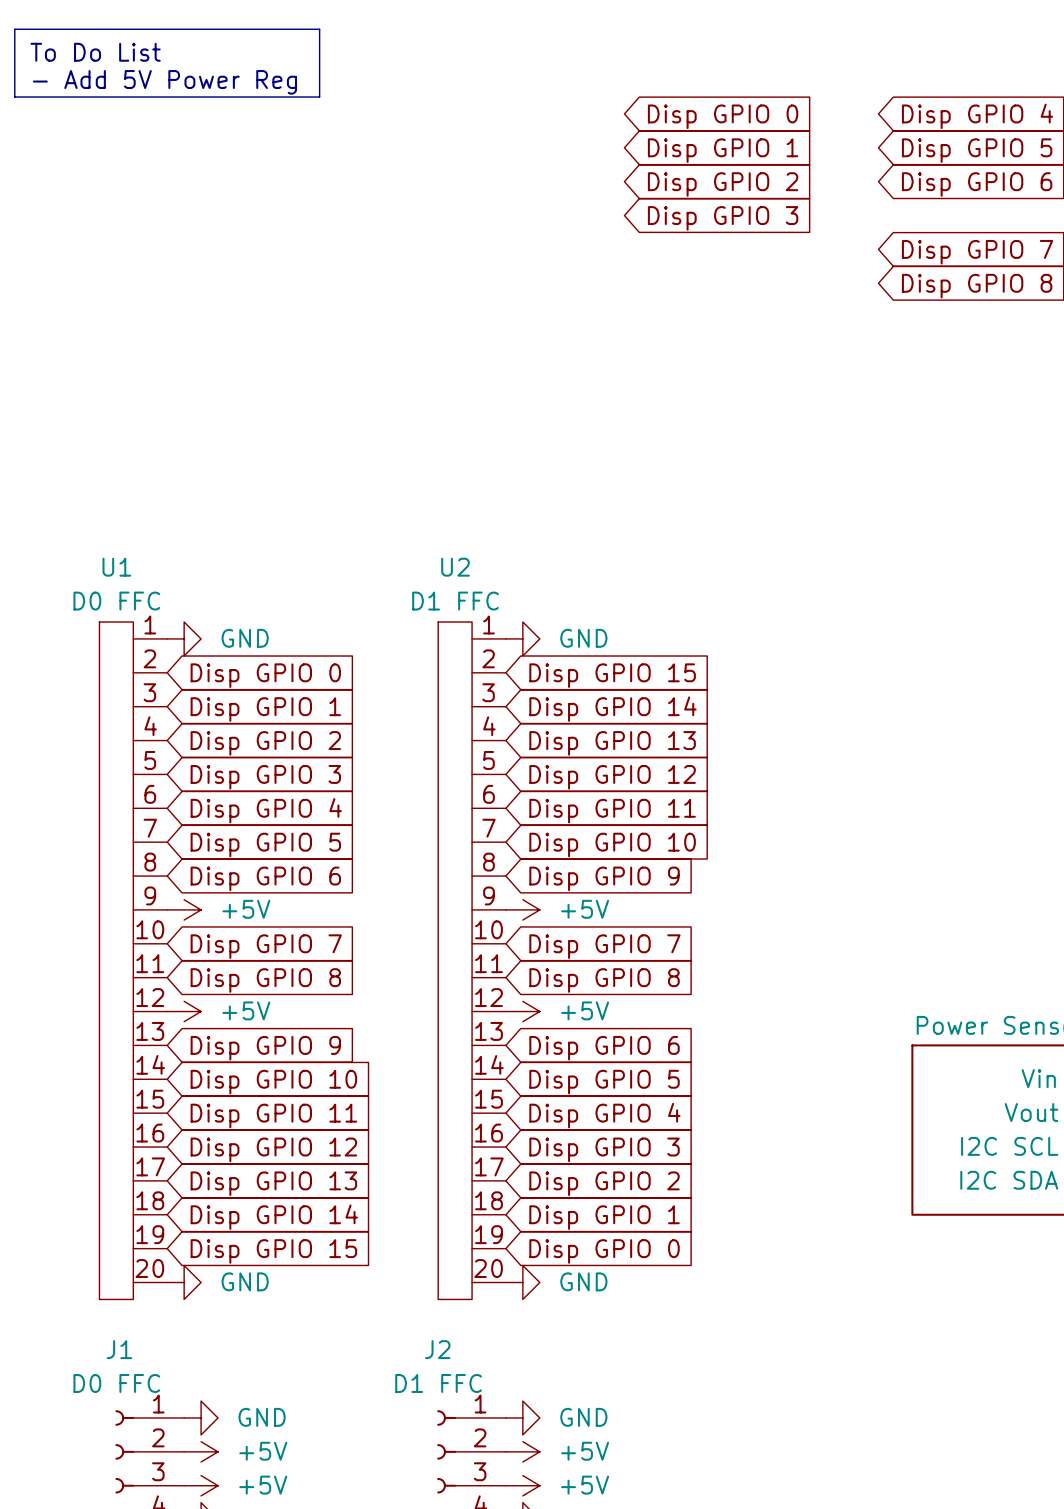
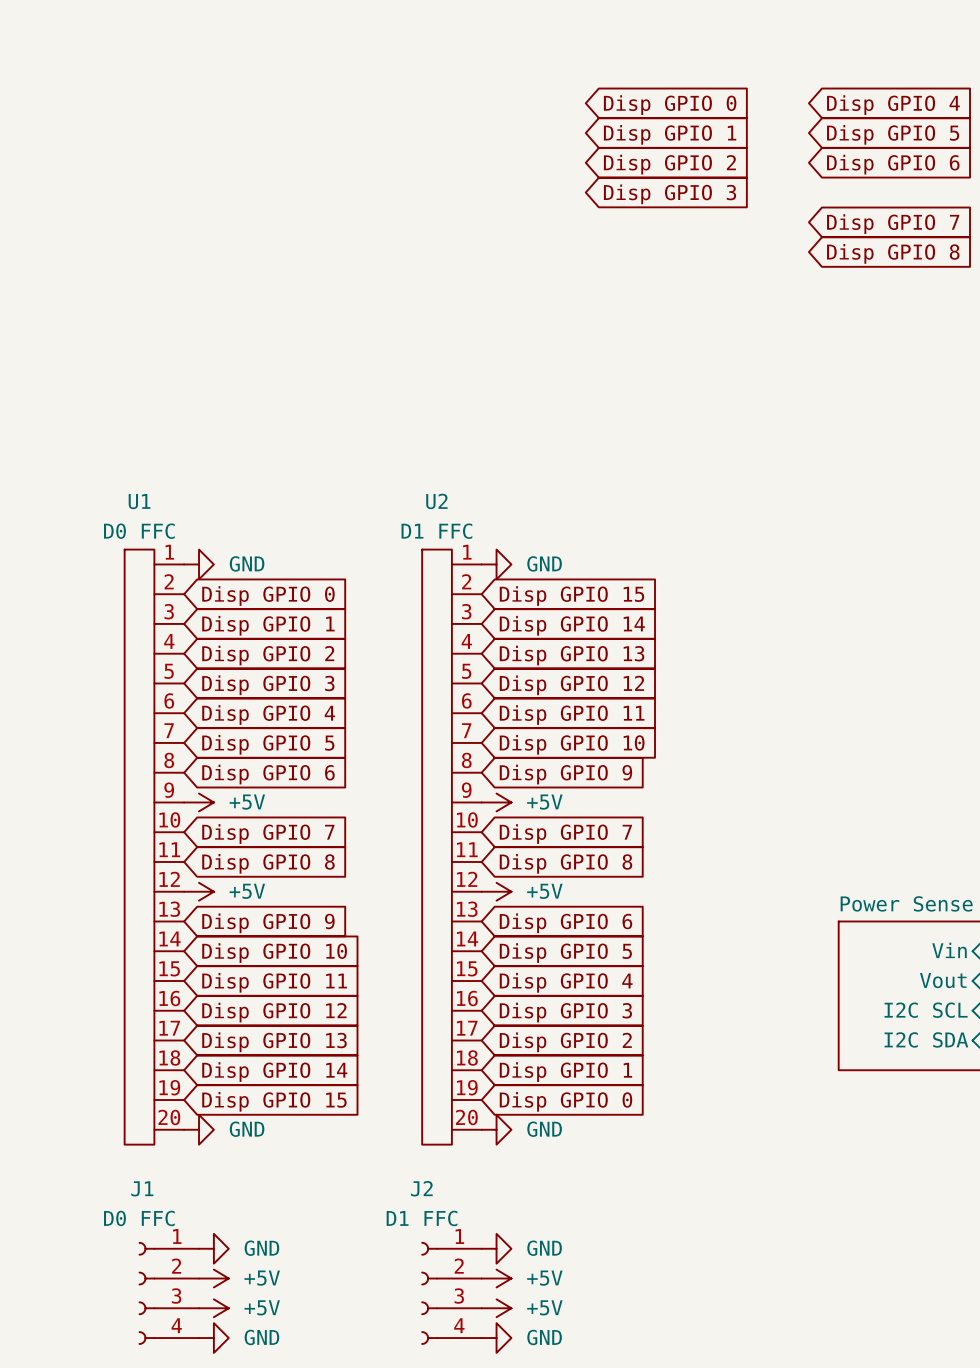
line: (14, 29) (319, 29) (319, 97) (14, 97) (14, 29) -> none
text: To Do List (95, 52) -> none
text: - Add 5V Power Reg (164, 82) -> none

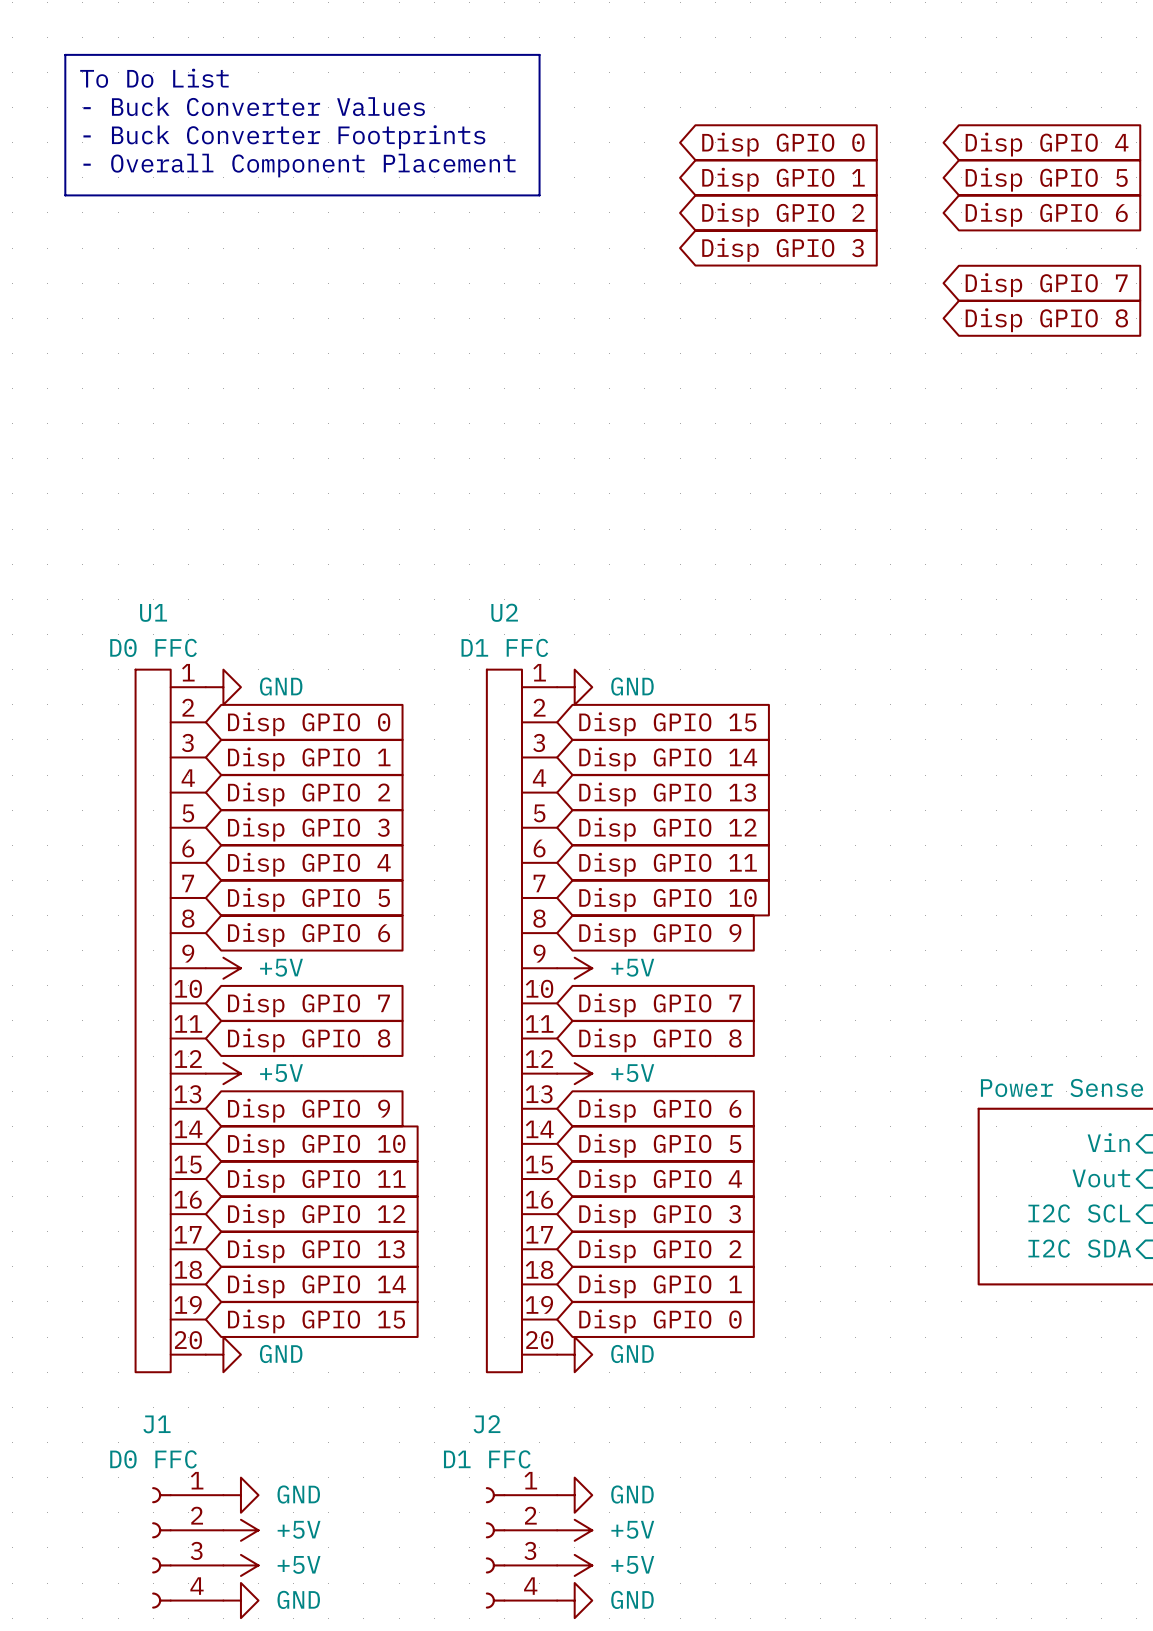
line: none -> (65, 54) (539, 54) (539, 195) (65, 195) (65, 54)
text: none -> To Do List (154, 78)
text: none -> - Buck Converter Values (254, 106)
text: none -> - Buck Converter Footprints (284, 137)
text: none -> - Overall Component Placement (299, 165)

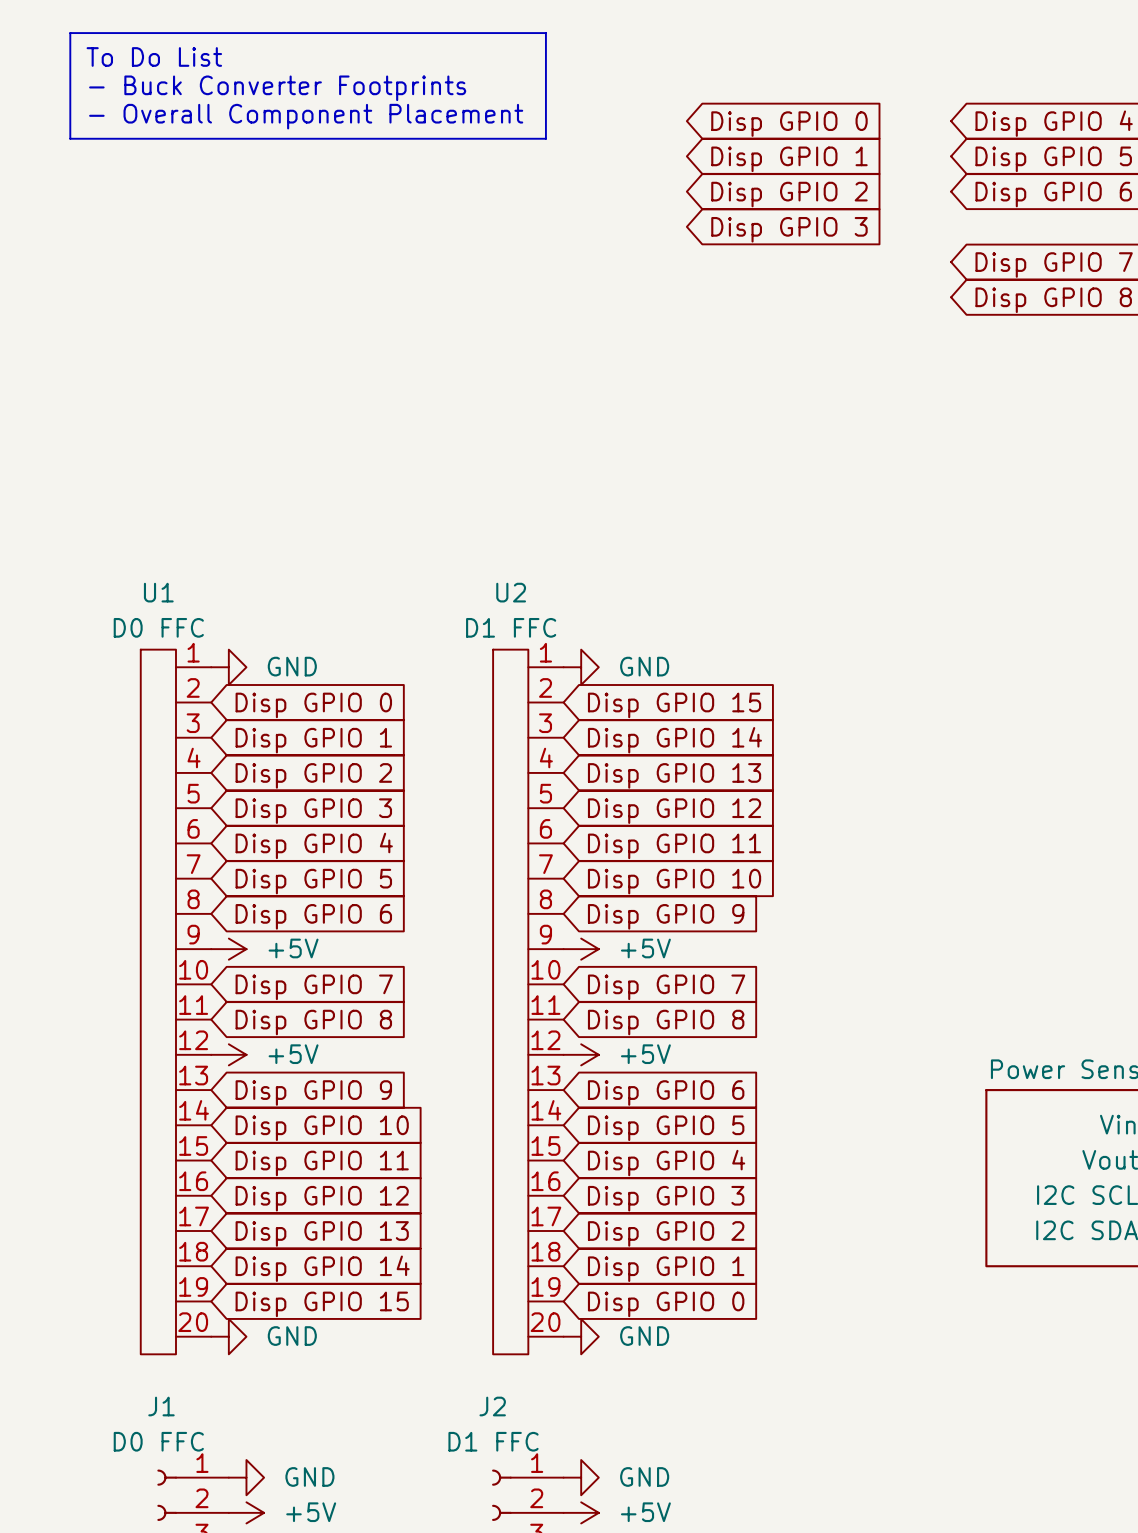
text: - Buck Converter Values (254, 106) -> - Buck Converter Footprints (277, 88)
text: - Buck Converter Footprints (284, 137) -> - Overall Component Placement (306, 116)
line: (65, 160) (65, 195) (539, 195) (539, 160) -> (70, 138) (545, 138)
text: - Overall Component Placement (299, 165) -> none

